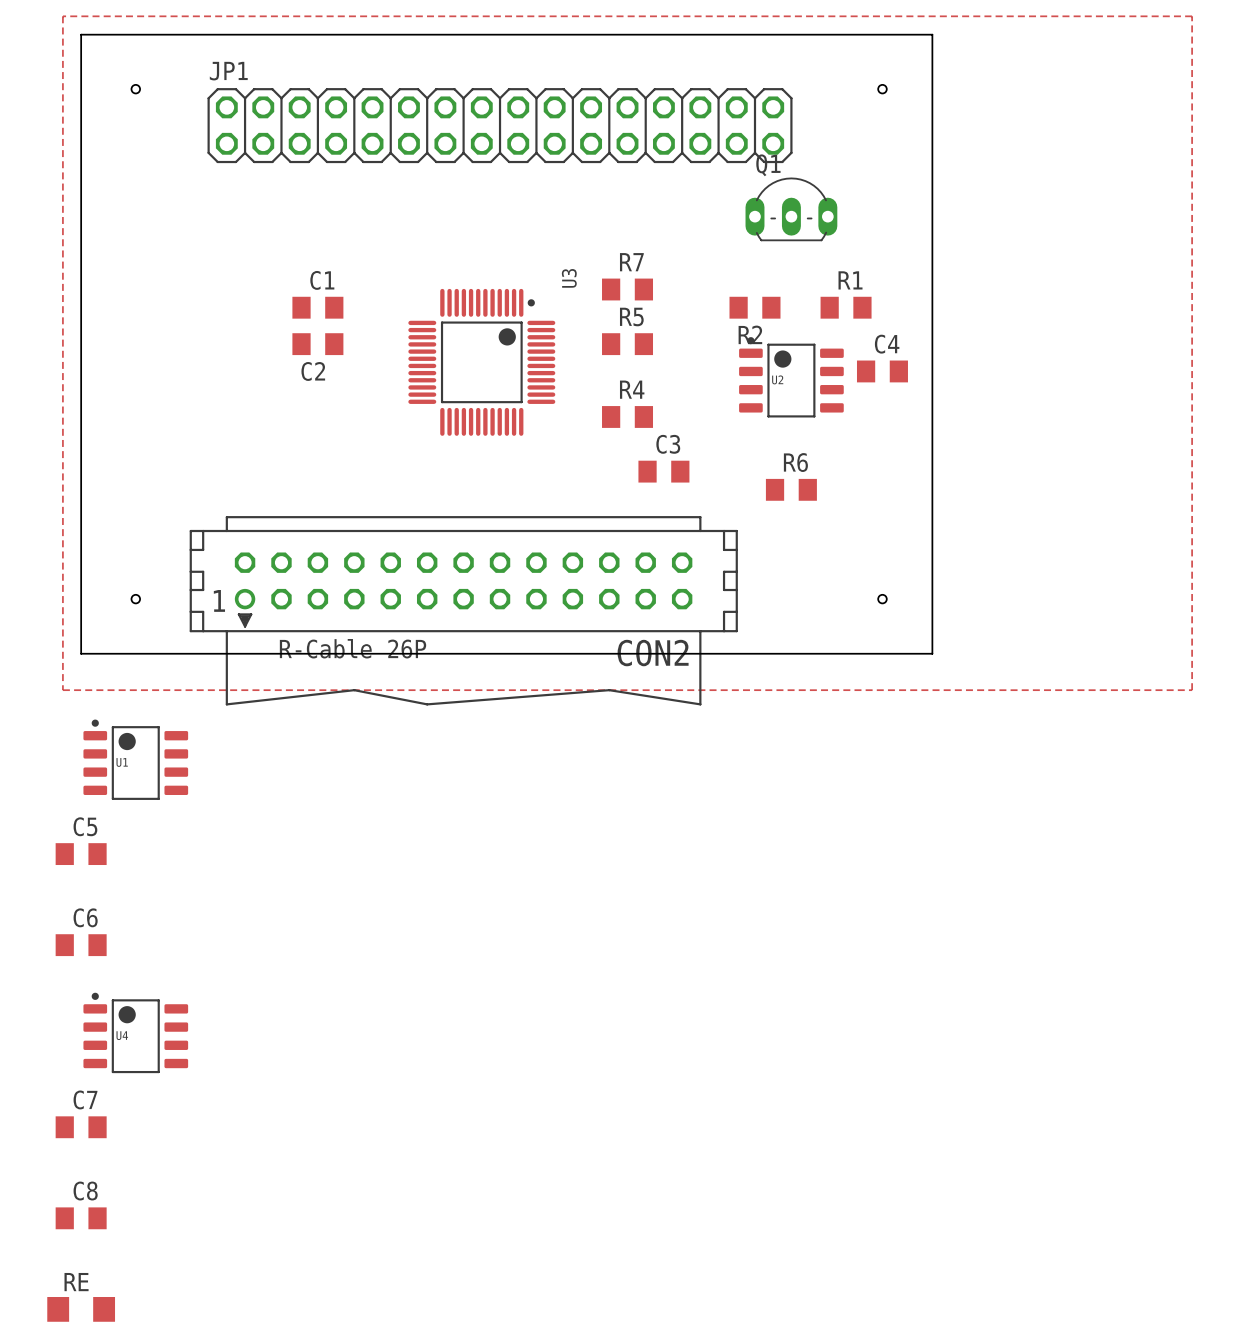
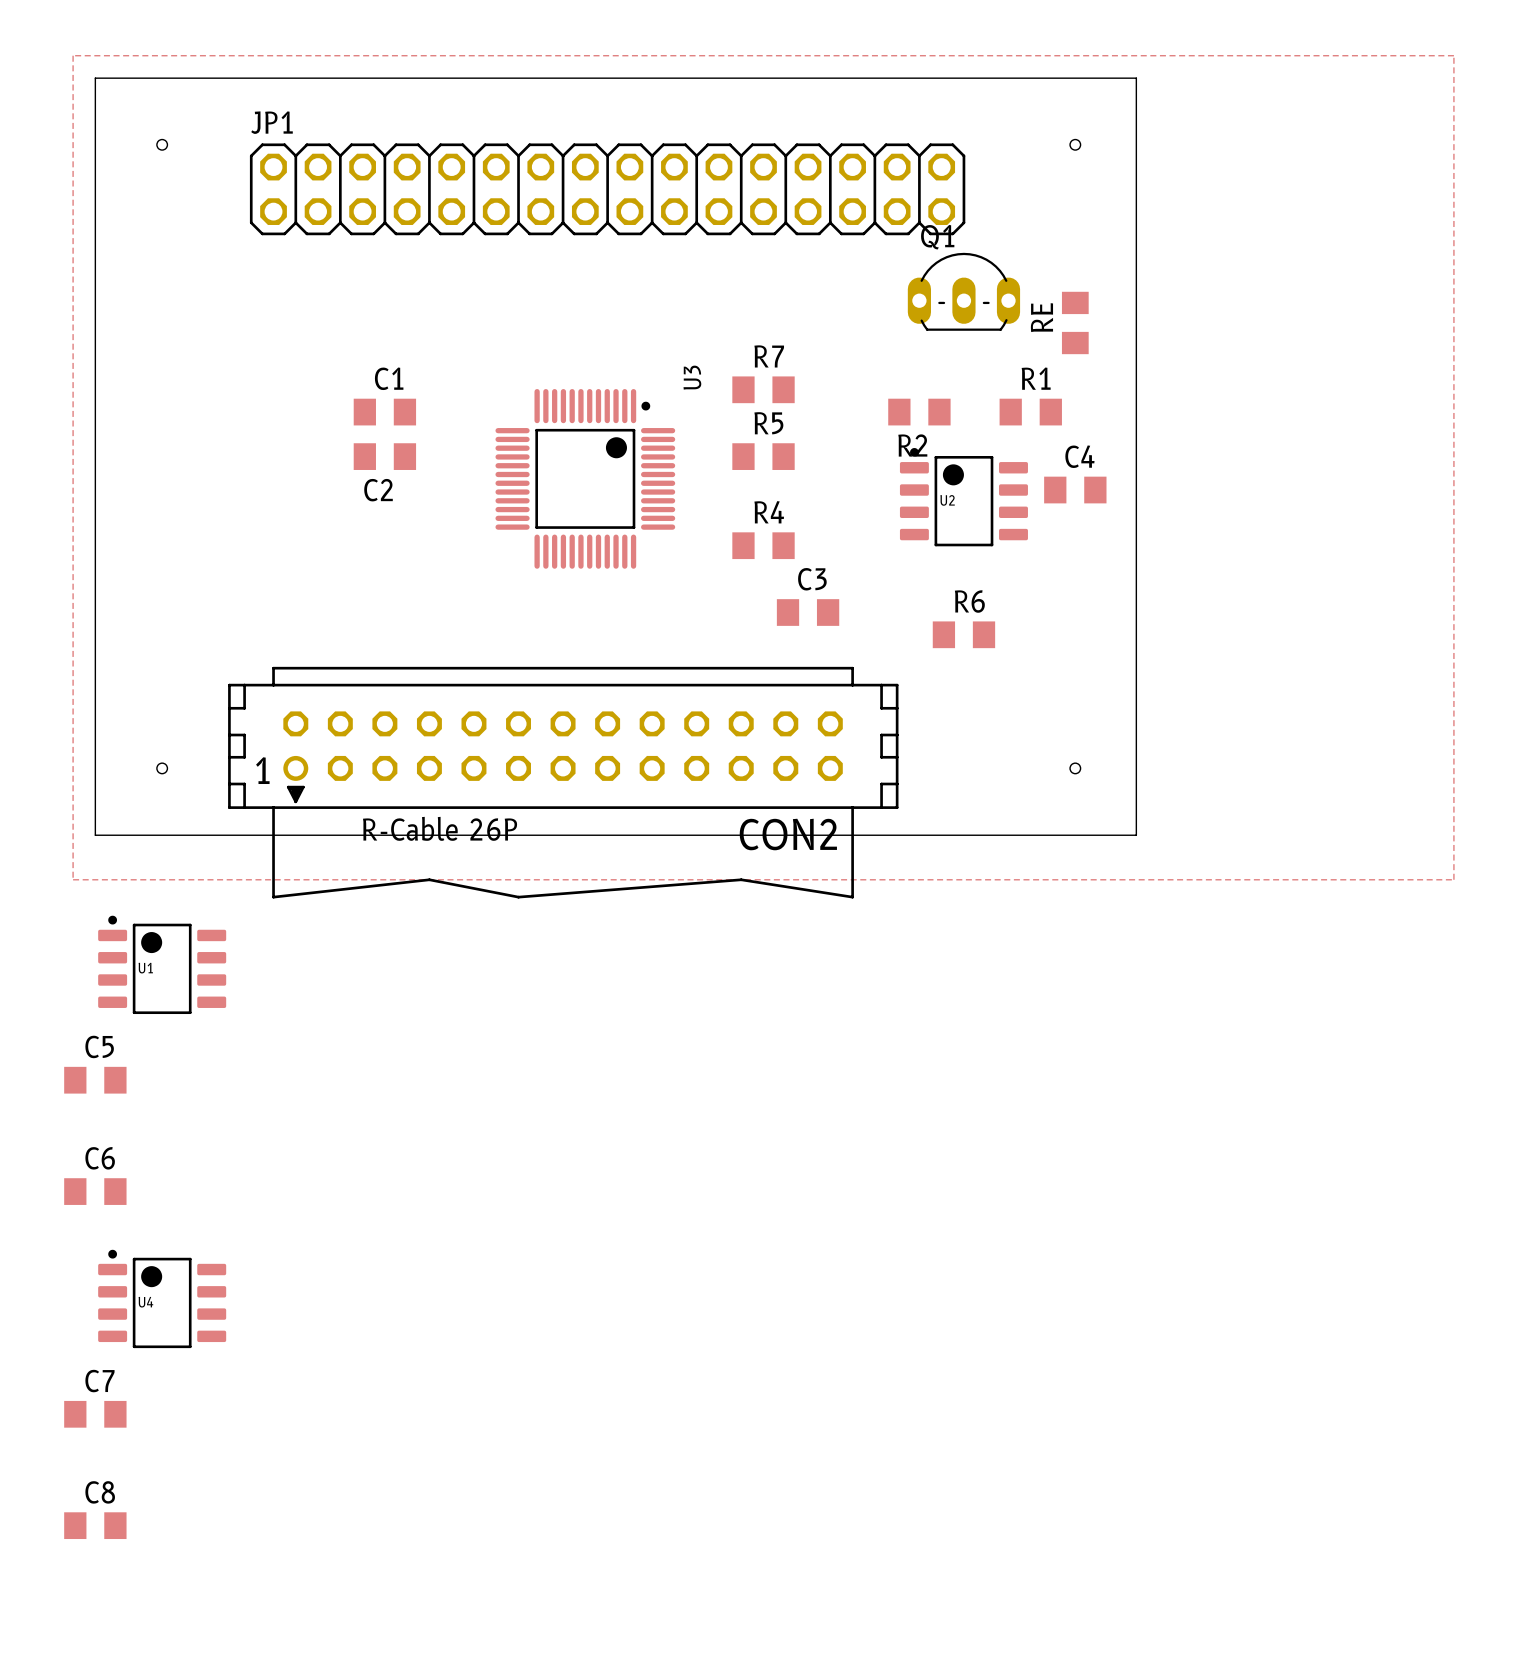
RE: none -> (1075, 322)
RE: (81, 1309) -> none

